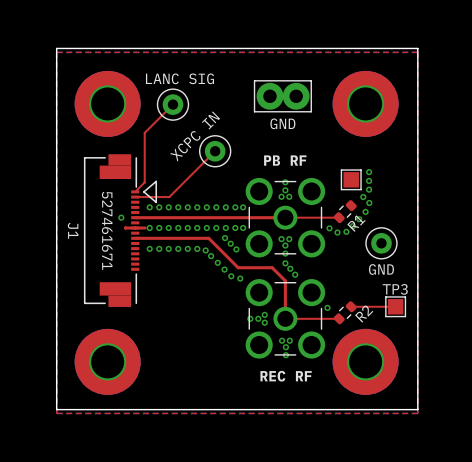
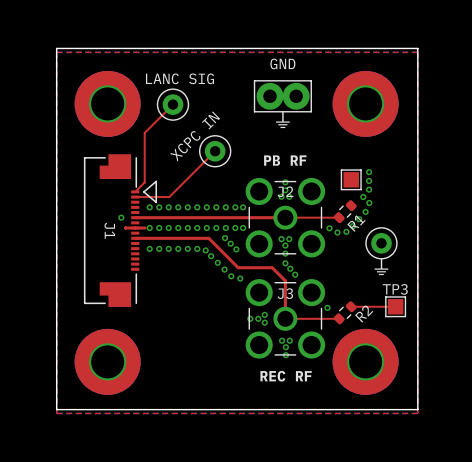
text: none -> ⏚ (282, 119)
part text position: GND (282, 123) -> GND (282, 63)
J1 footprint: [83, 154, 158, 307] -> [83, 154, 158, 307]
J2 name: none -> J2 (285, 191)
J1 name position: J1 (73, 230) -> J1 (109, 230)
text: none -> ⏚ (381, 266)
part text: GND (381, 269) -> none
J3 name: none -> J3 (285, 293)

